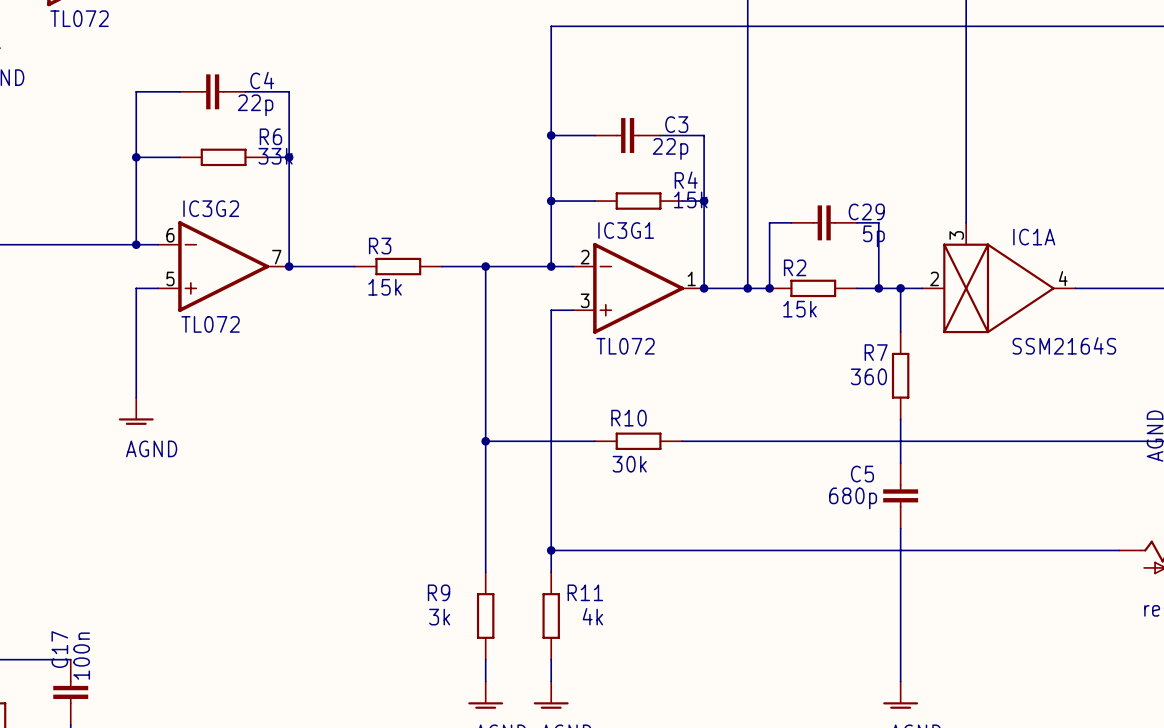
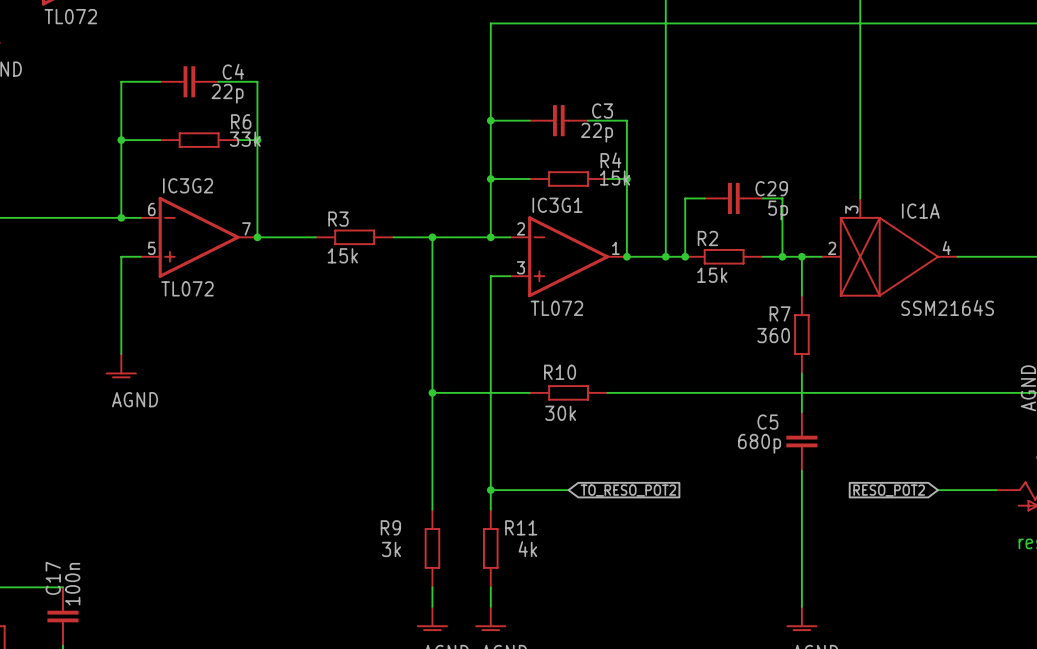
wire: (638, 550) (1053, 550) -> none
global label: none -> TO_RESO_POT2 (628, 490)
global label: none -> RESO_POT2 (889, 490)

